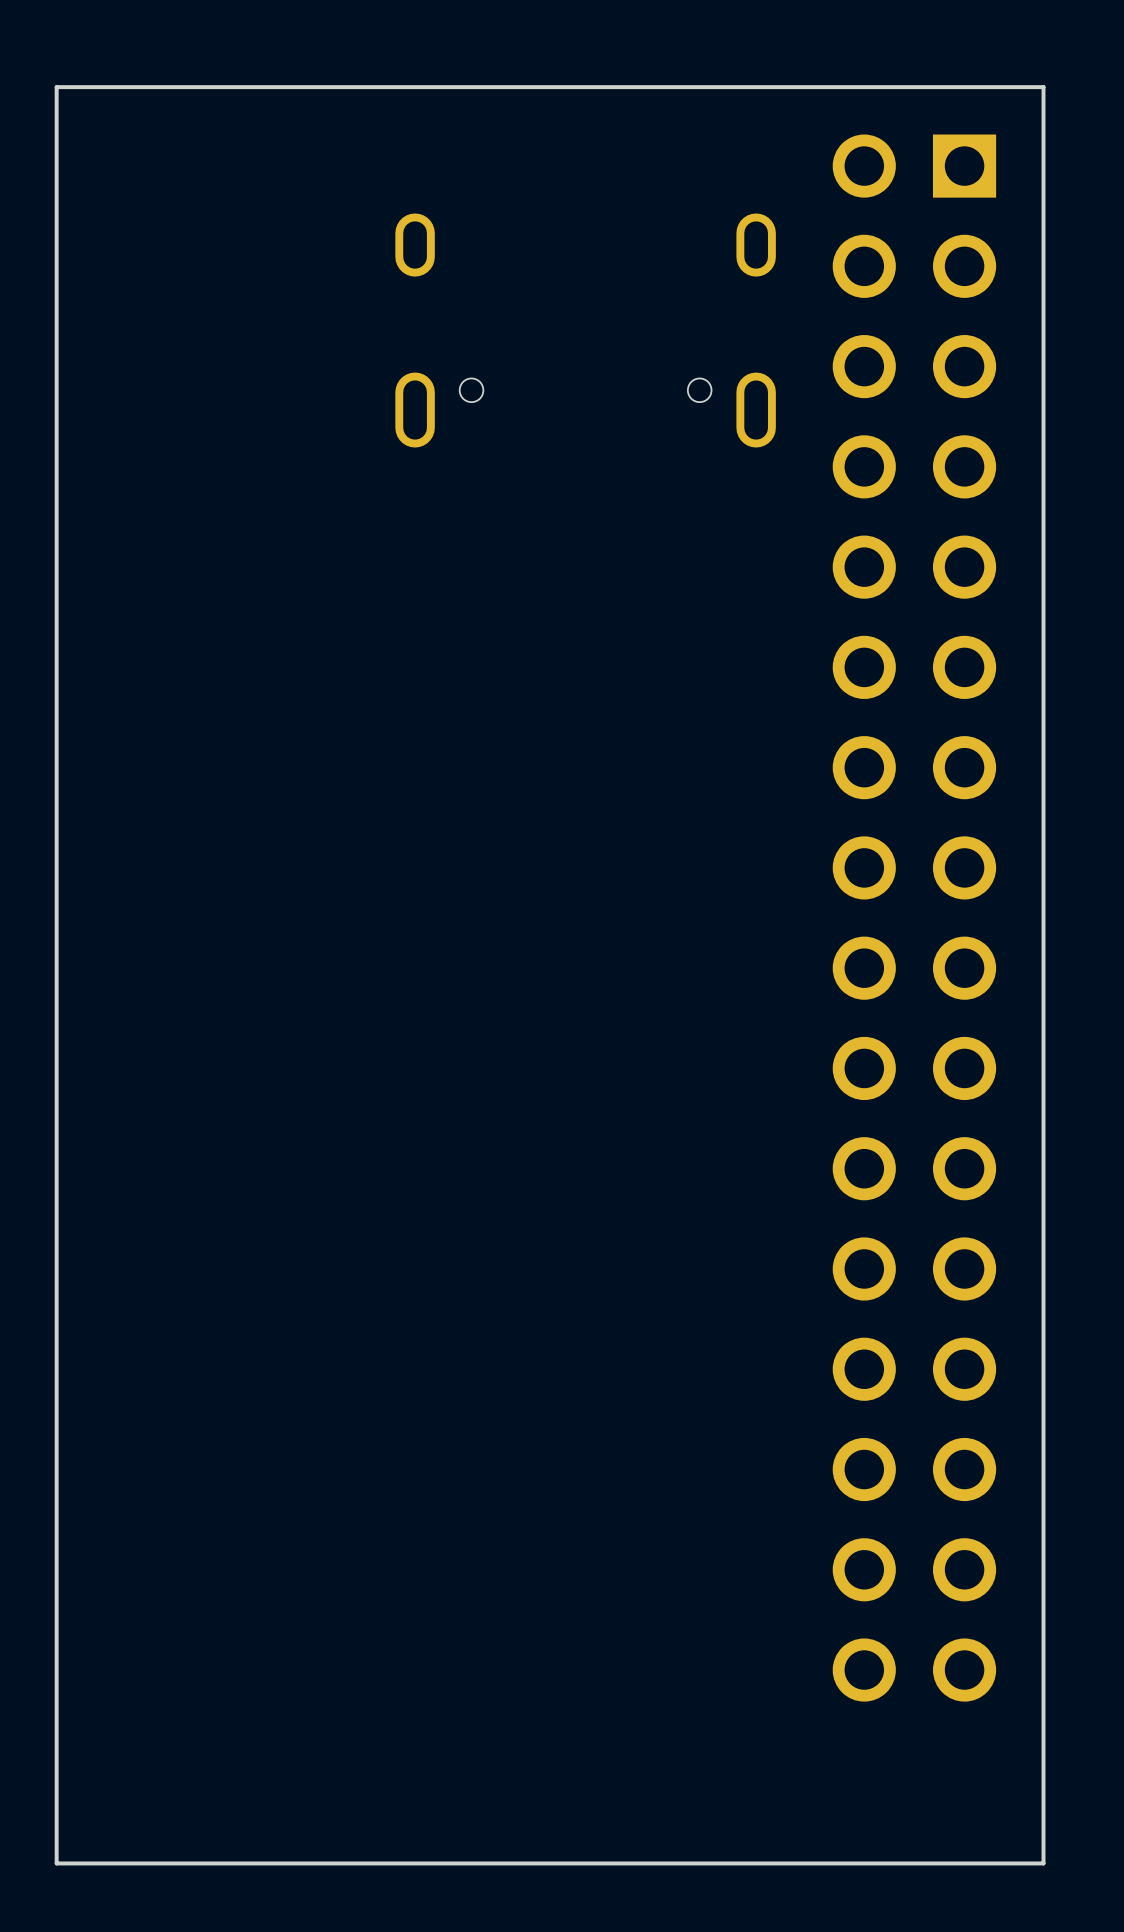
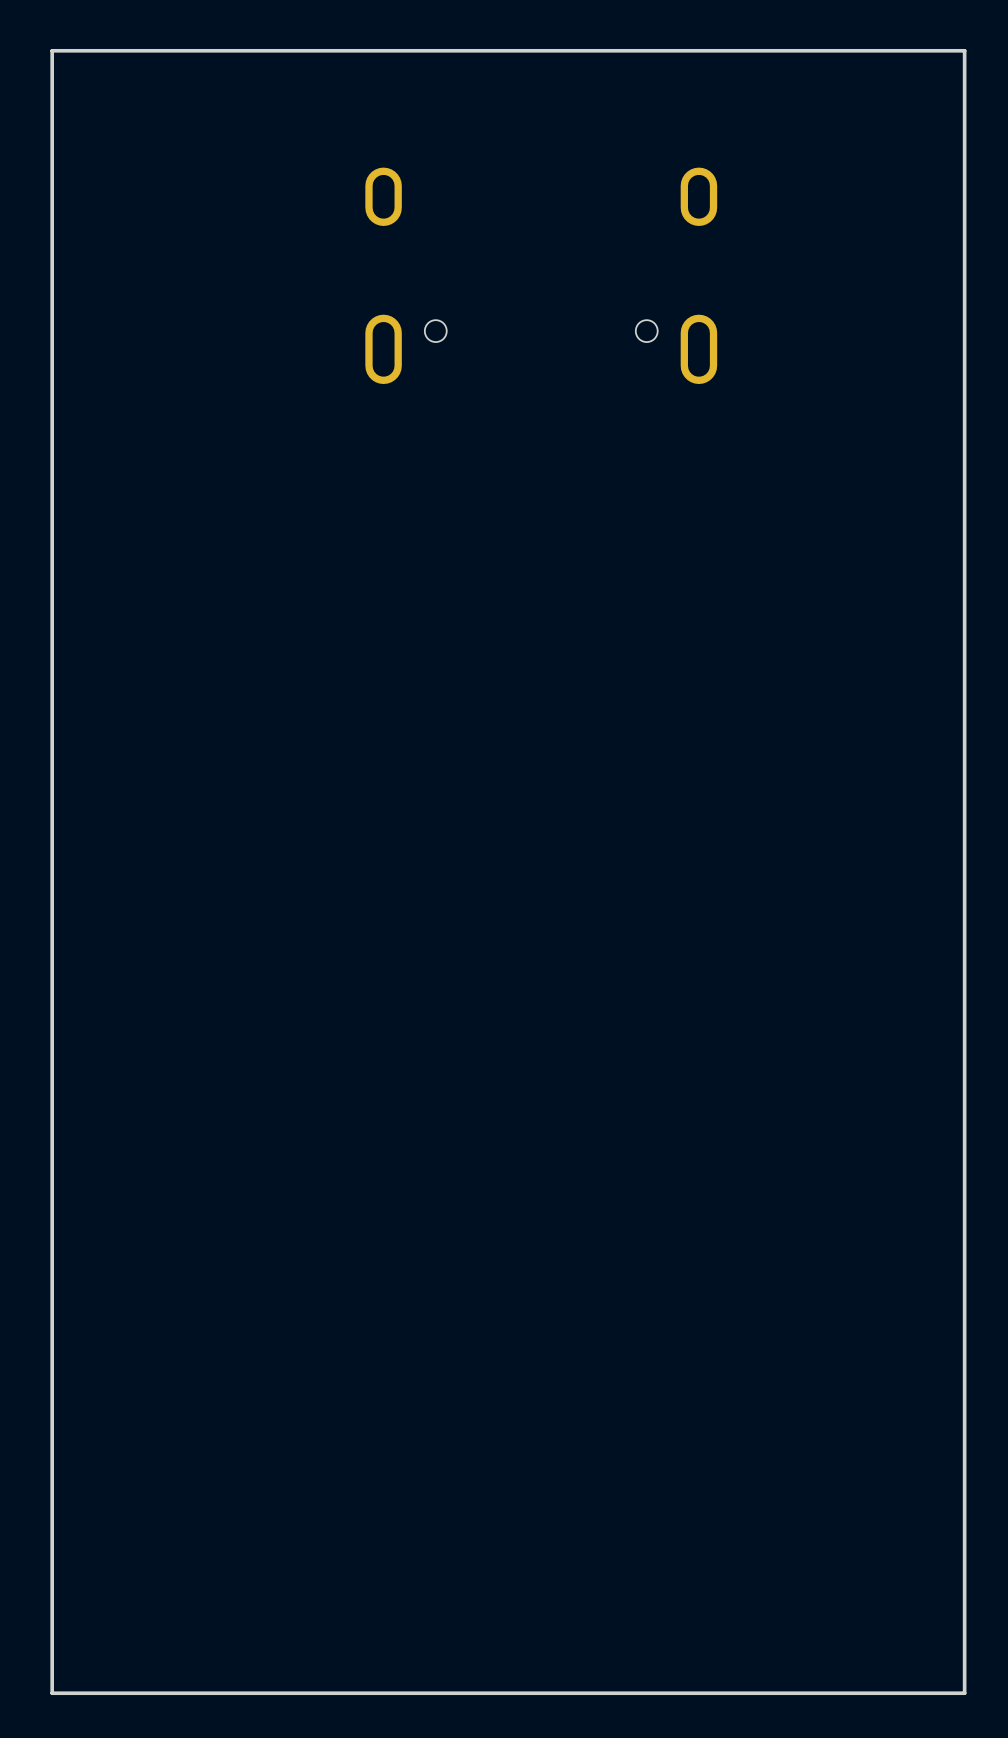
part: (914, 918) -> none

